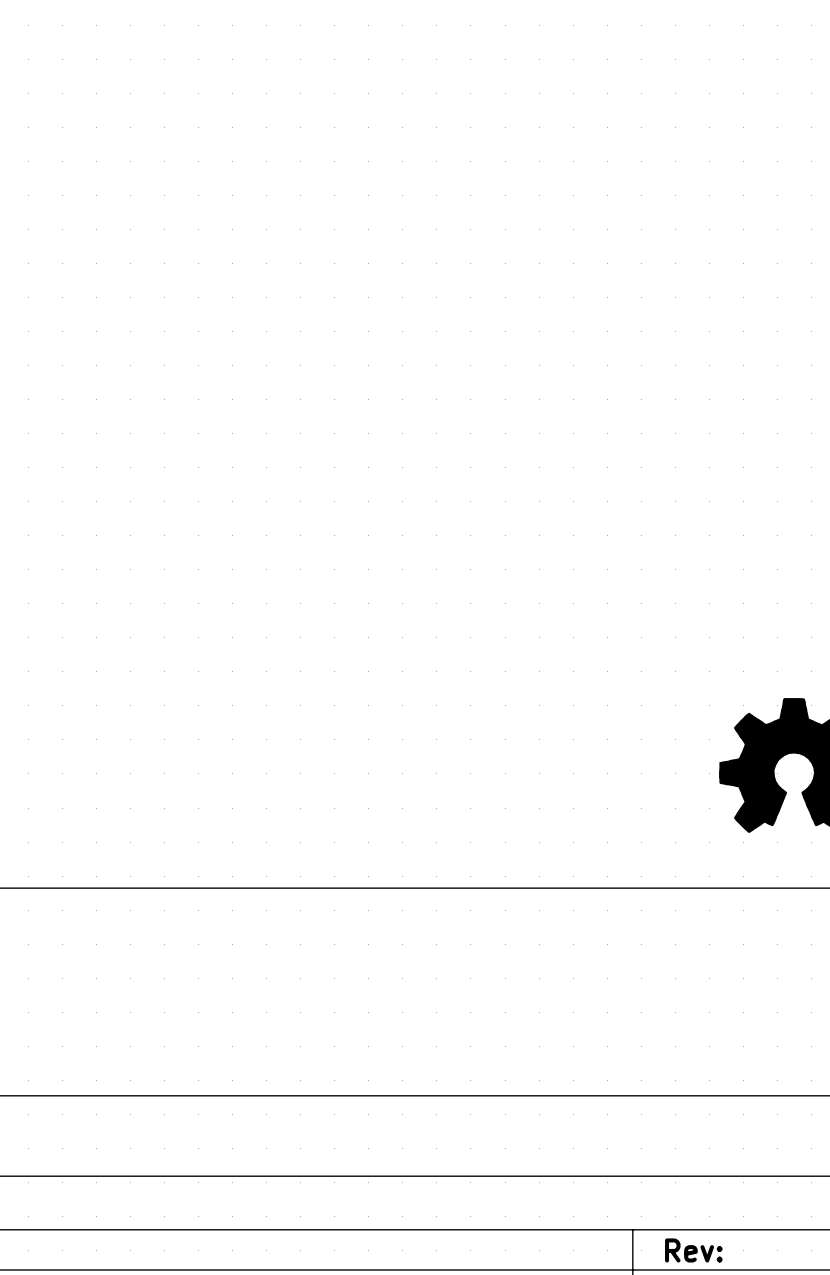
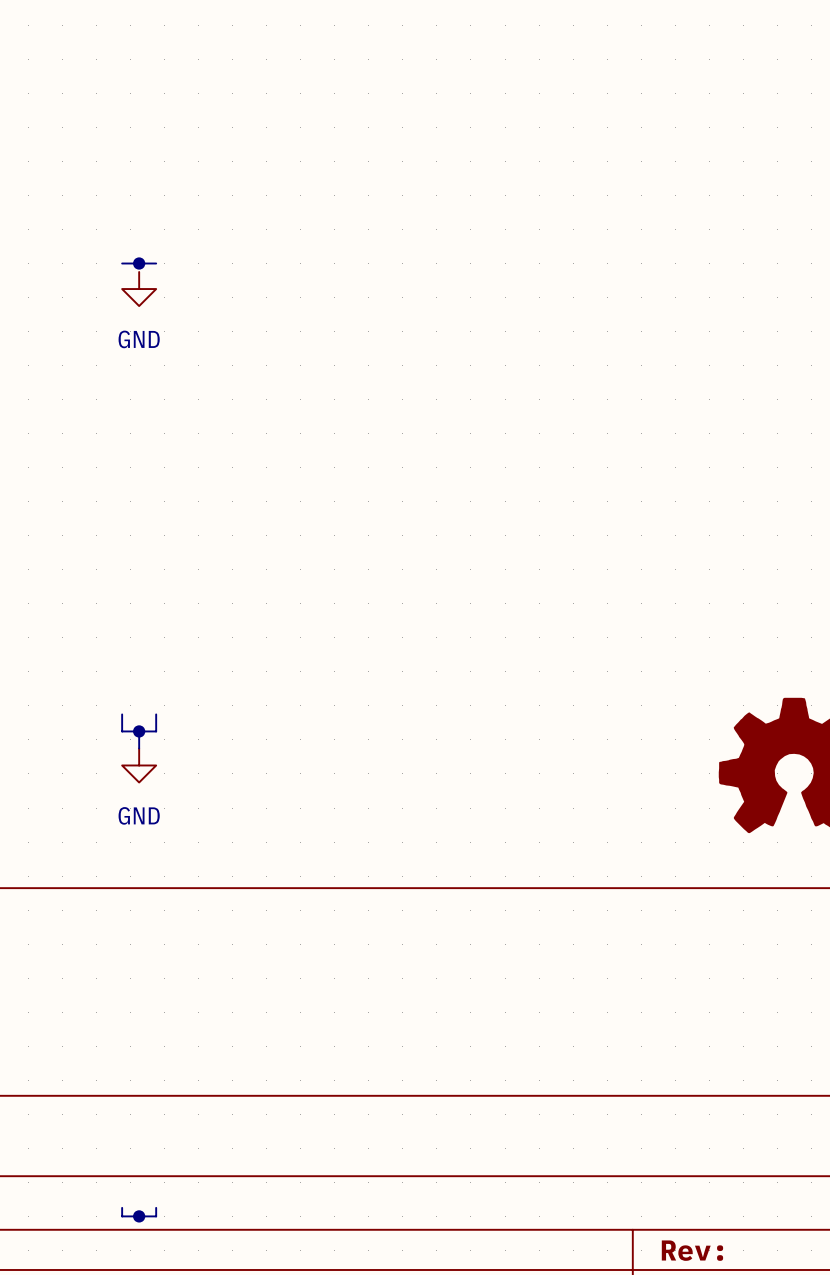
wire: none -> (122, 263) (156, 263)
junction: none -> (139, 263)
power symbol: none -> GND (139, 289)
wire: none -> (122, 714) (122, 731) (156, 731) (156, 714)
wire: none -> (139, 731) (139, 748)
junction: none -> (139, 731)
power symbol: none -> GND (139, 765)
wire: none -> (122, 1207) (122, 1216) (156, 1216) (156, 1207)
junction: none -> (139, 1216)

